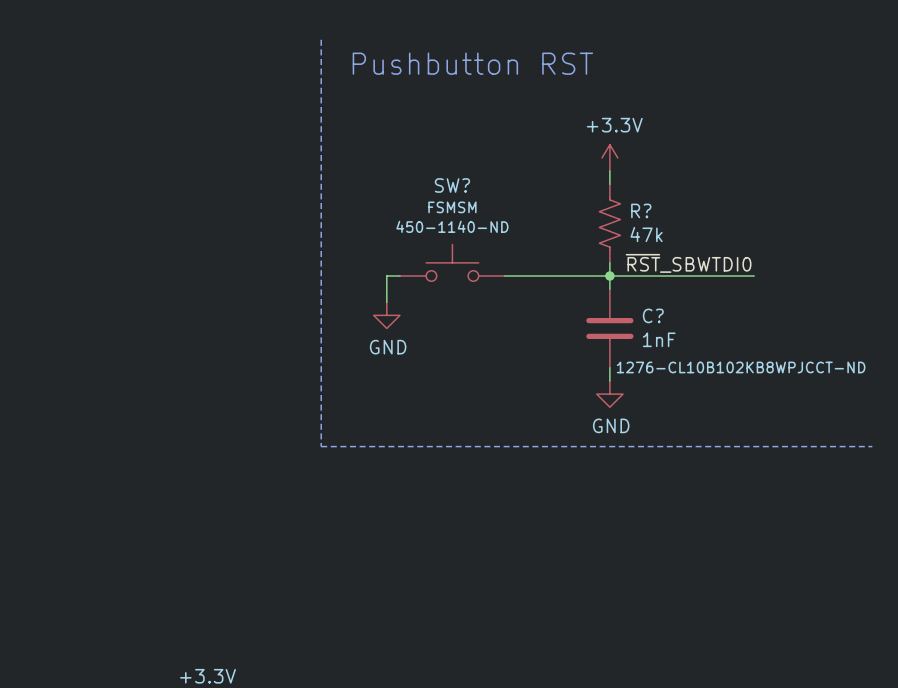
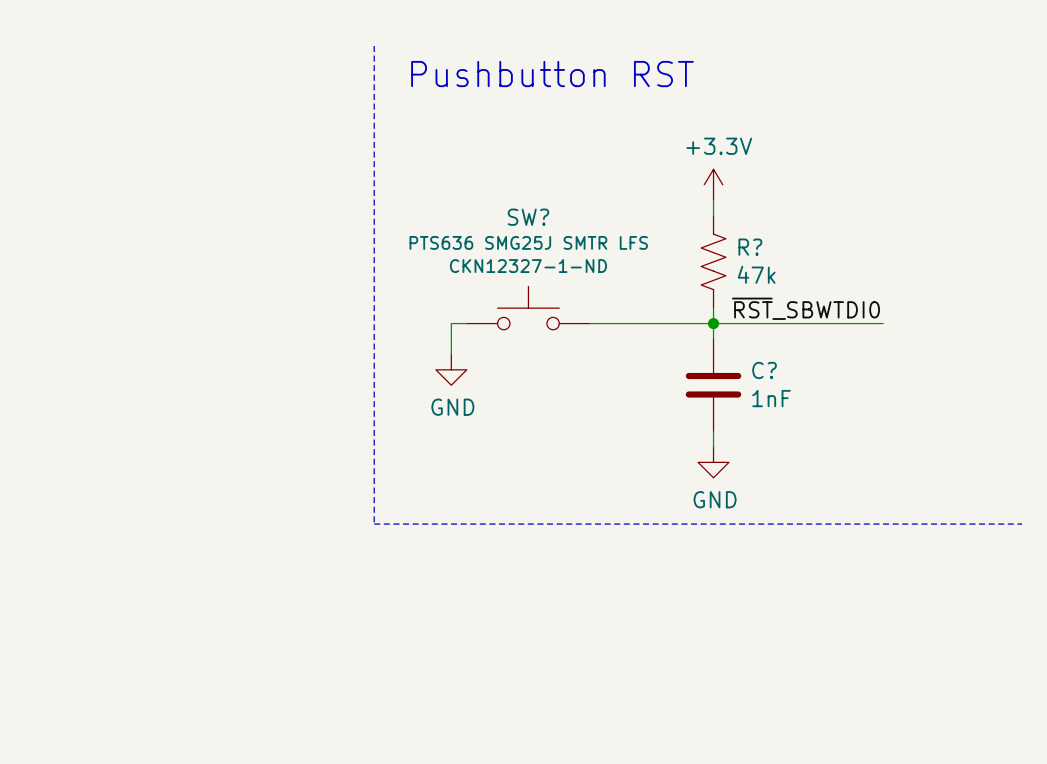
SW? value: FSMSM (452, 207) -> PTS636 SMG25J SMTR LFS (528, 242)
SW? text: 450-1140-ND (452, 226) -> CKN12327-1-ND (528, 266)
C? text: 1276-CL10B102KB8WPJCCT-ND (741, 367) -> none

